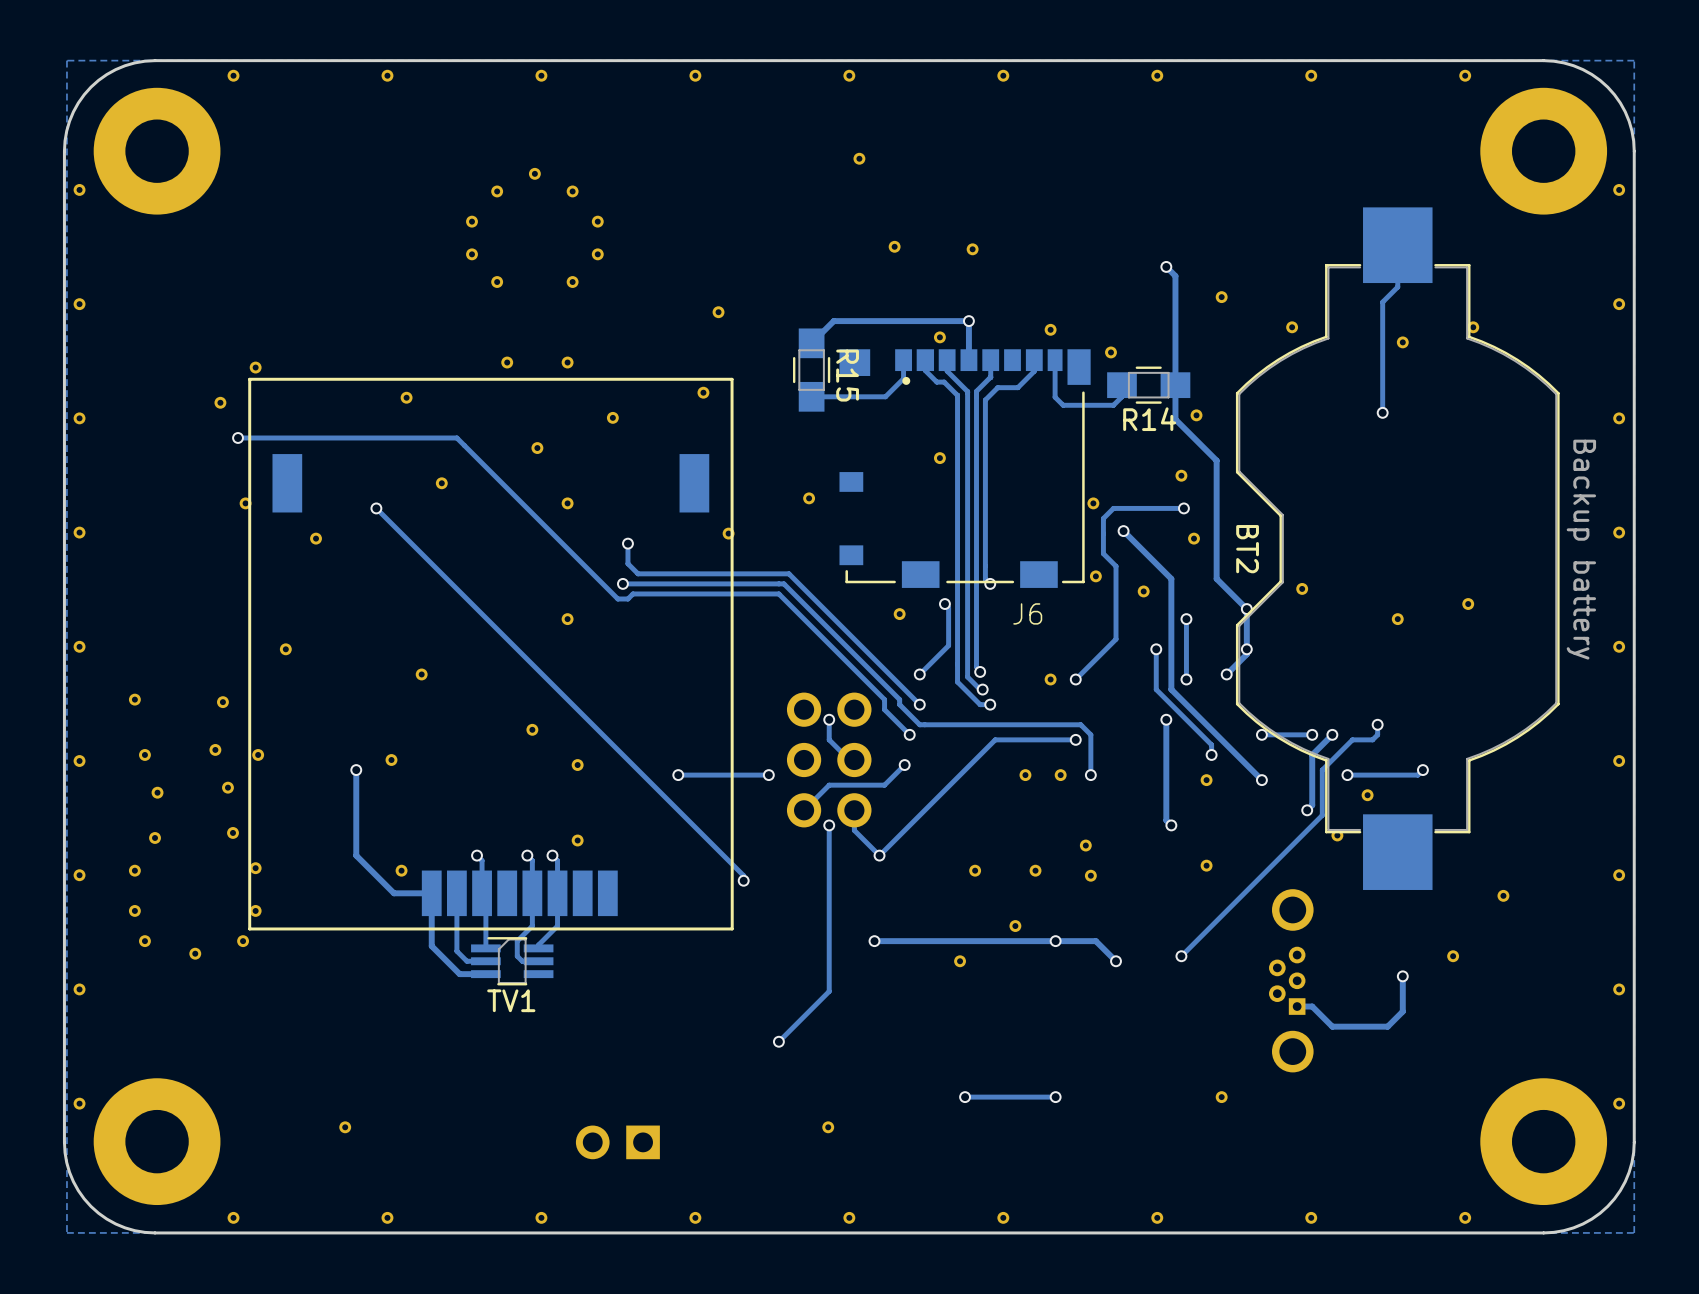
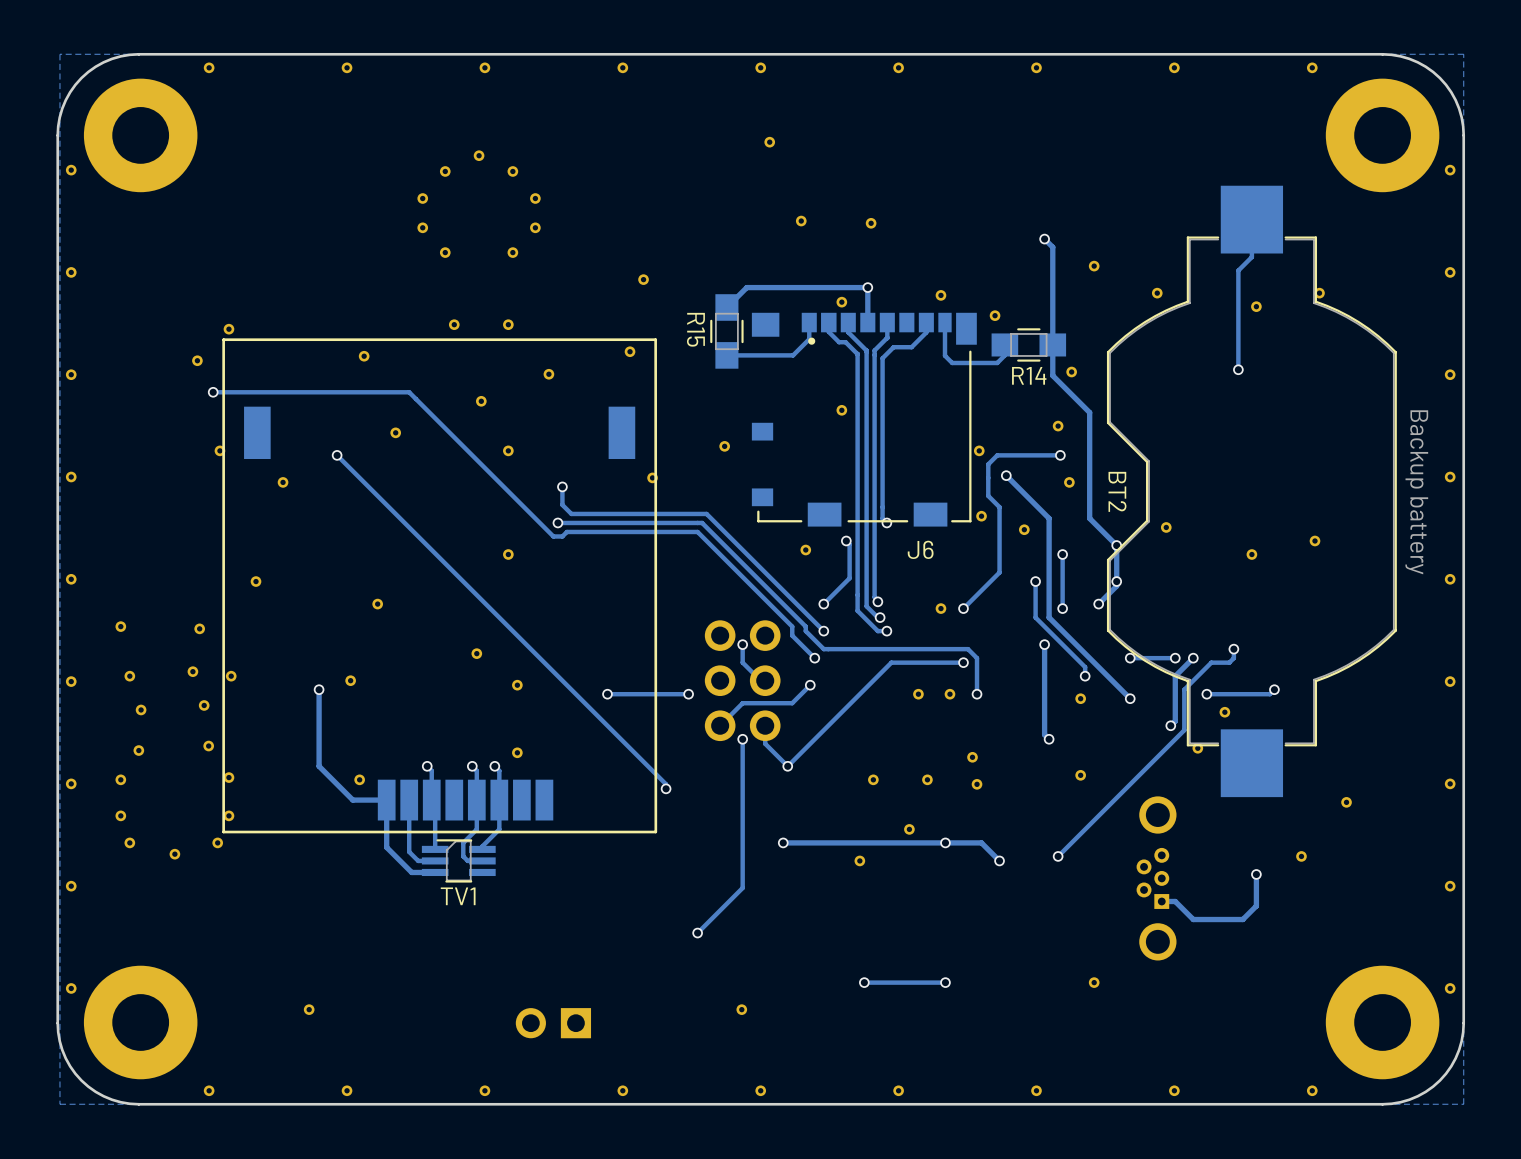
R15 name position: R15 (847, 375) -> R15 (695, 329)

